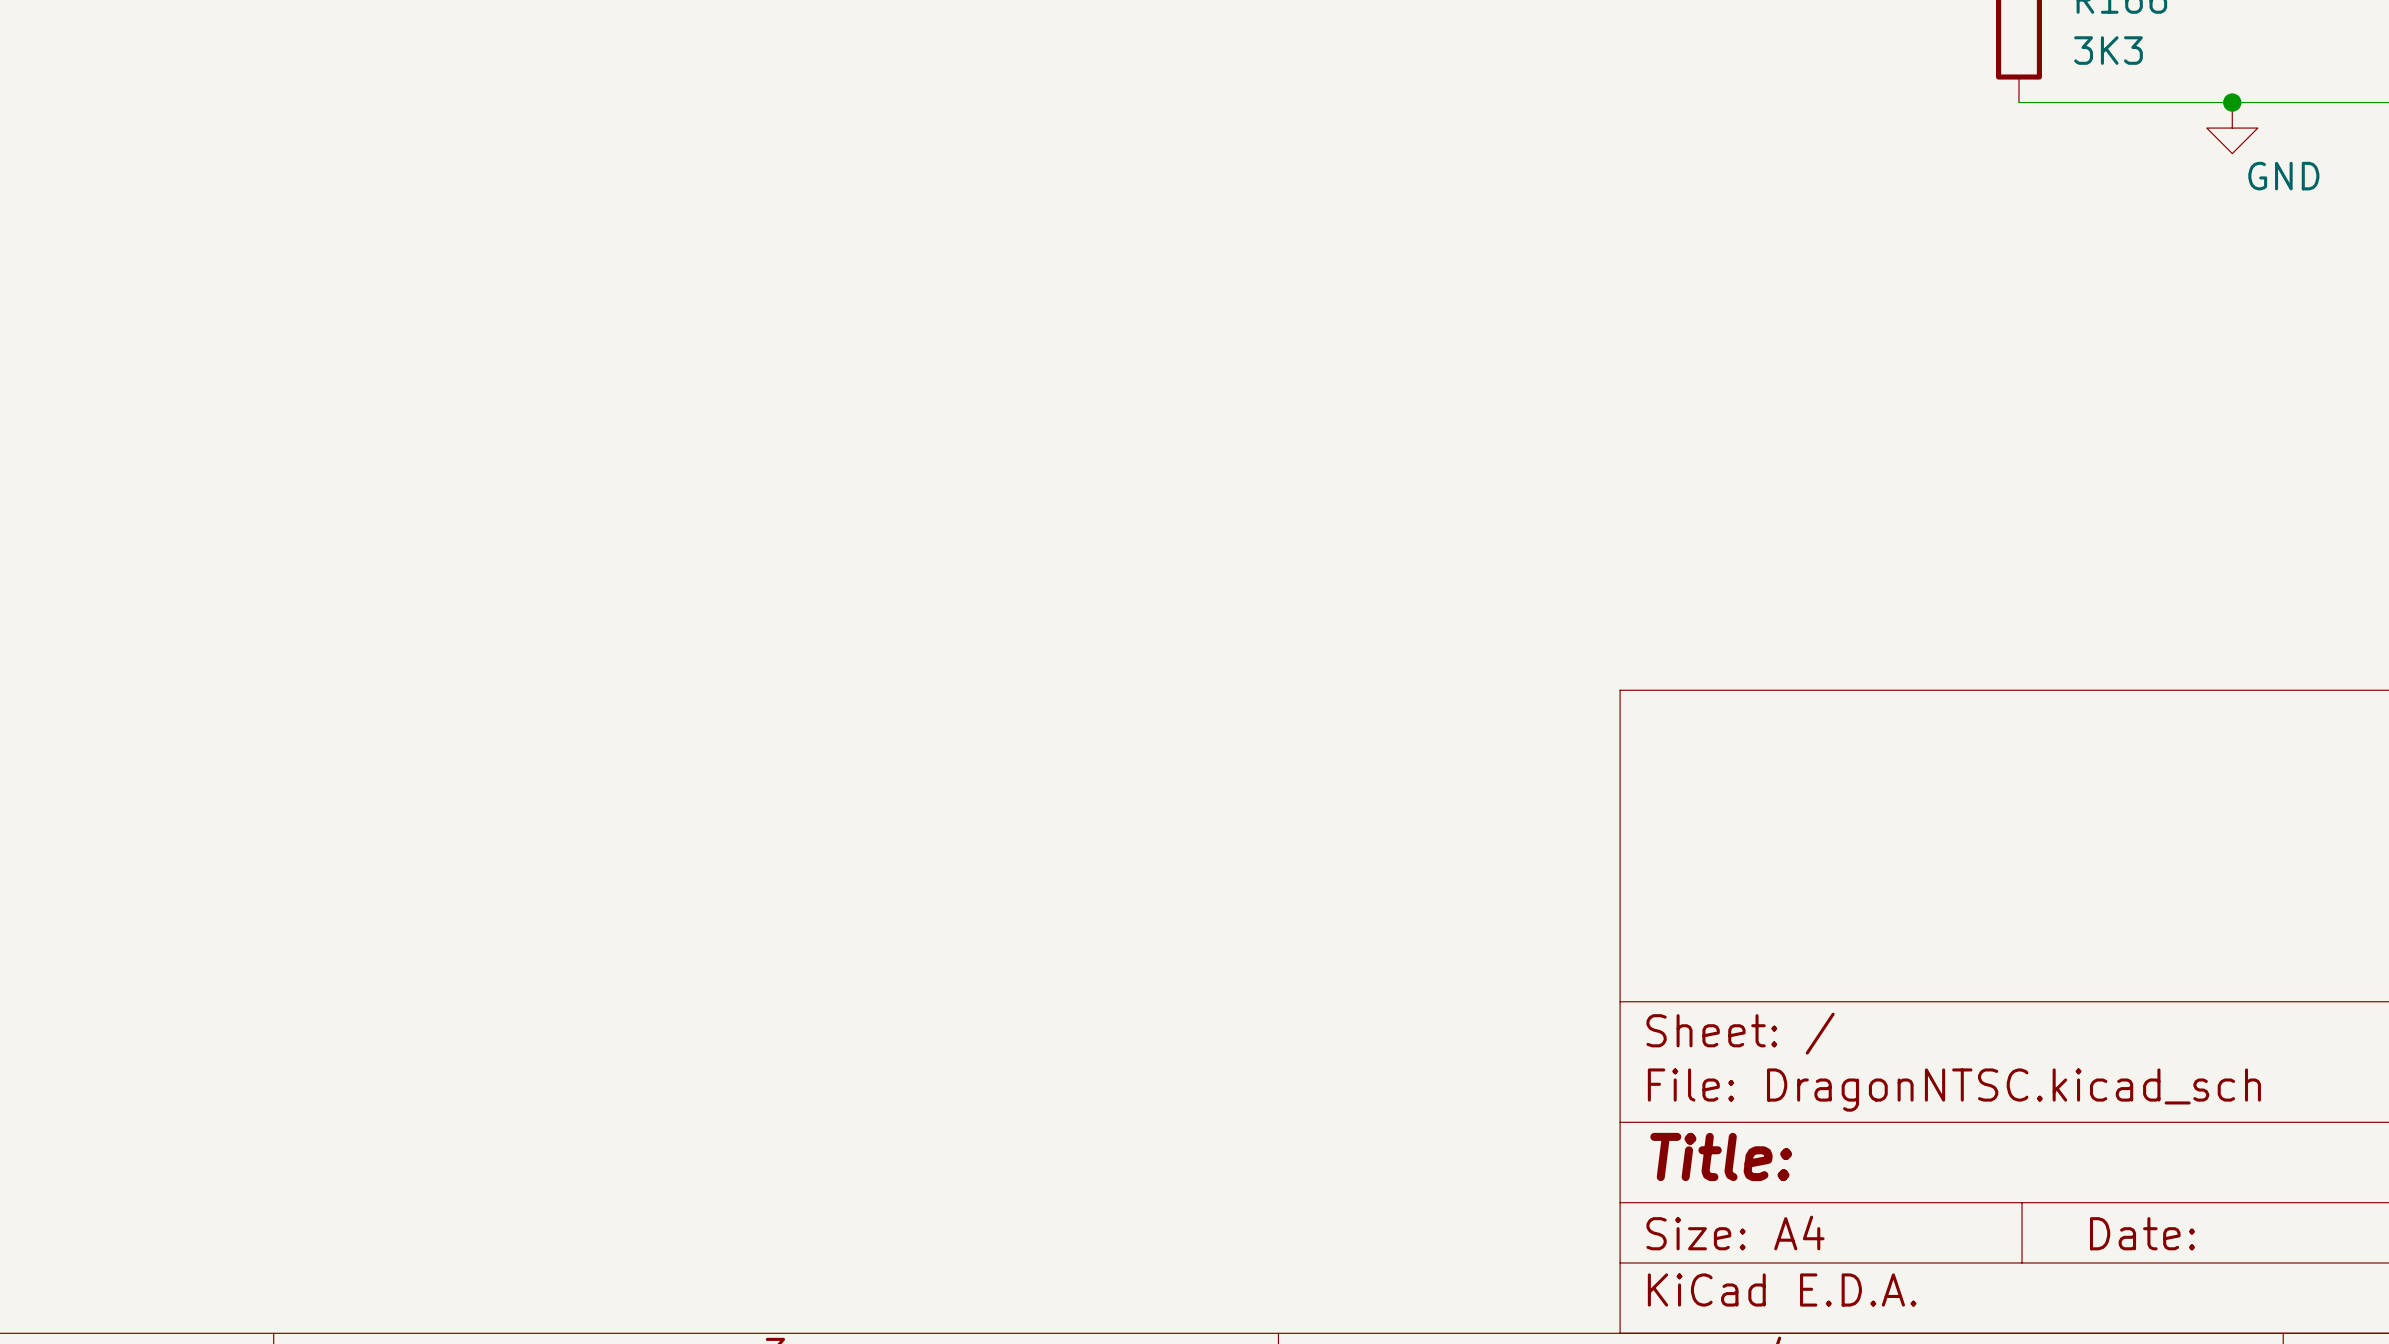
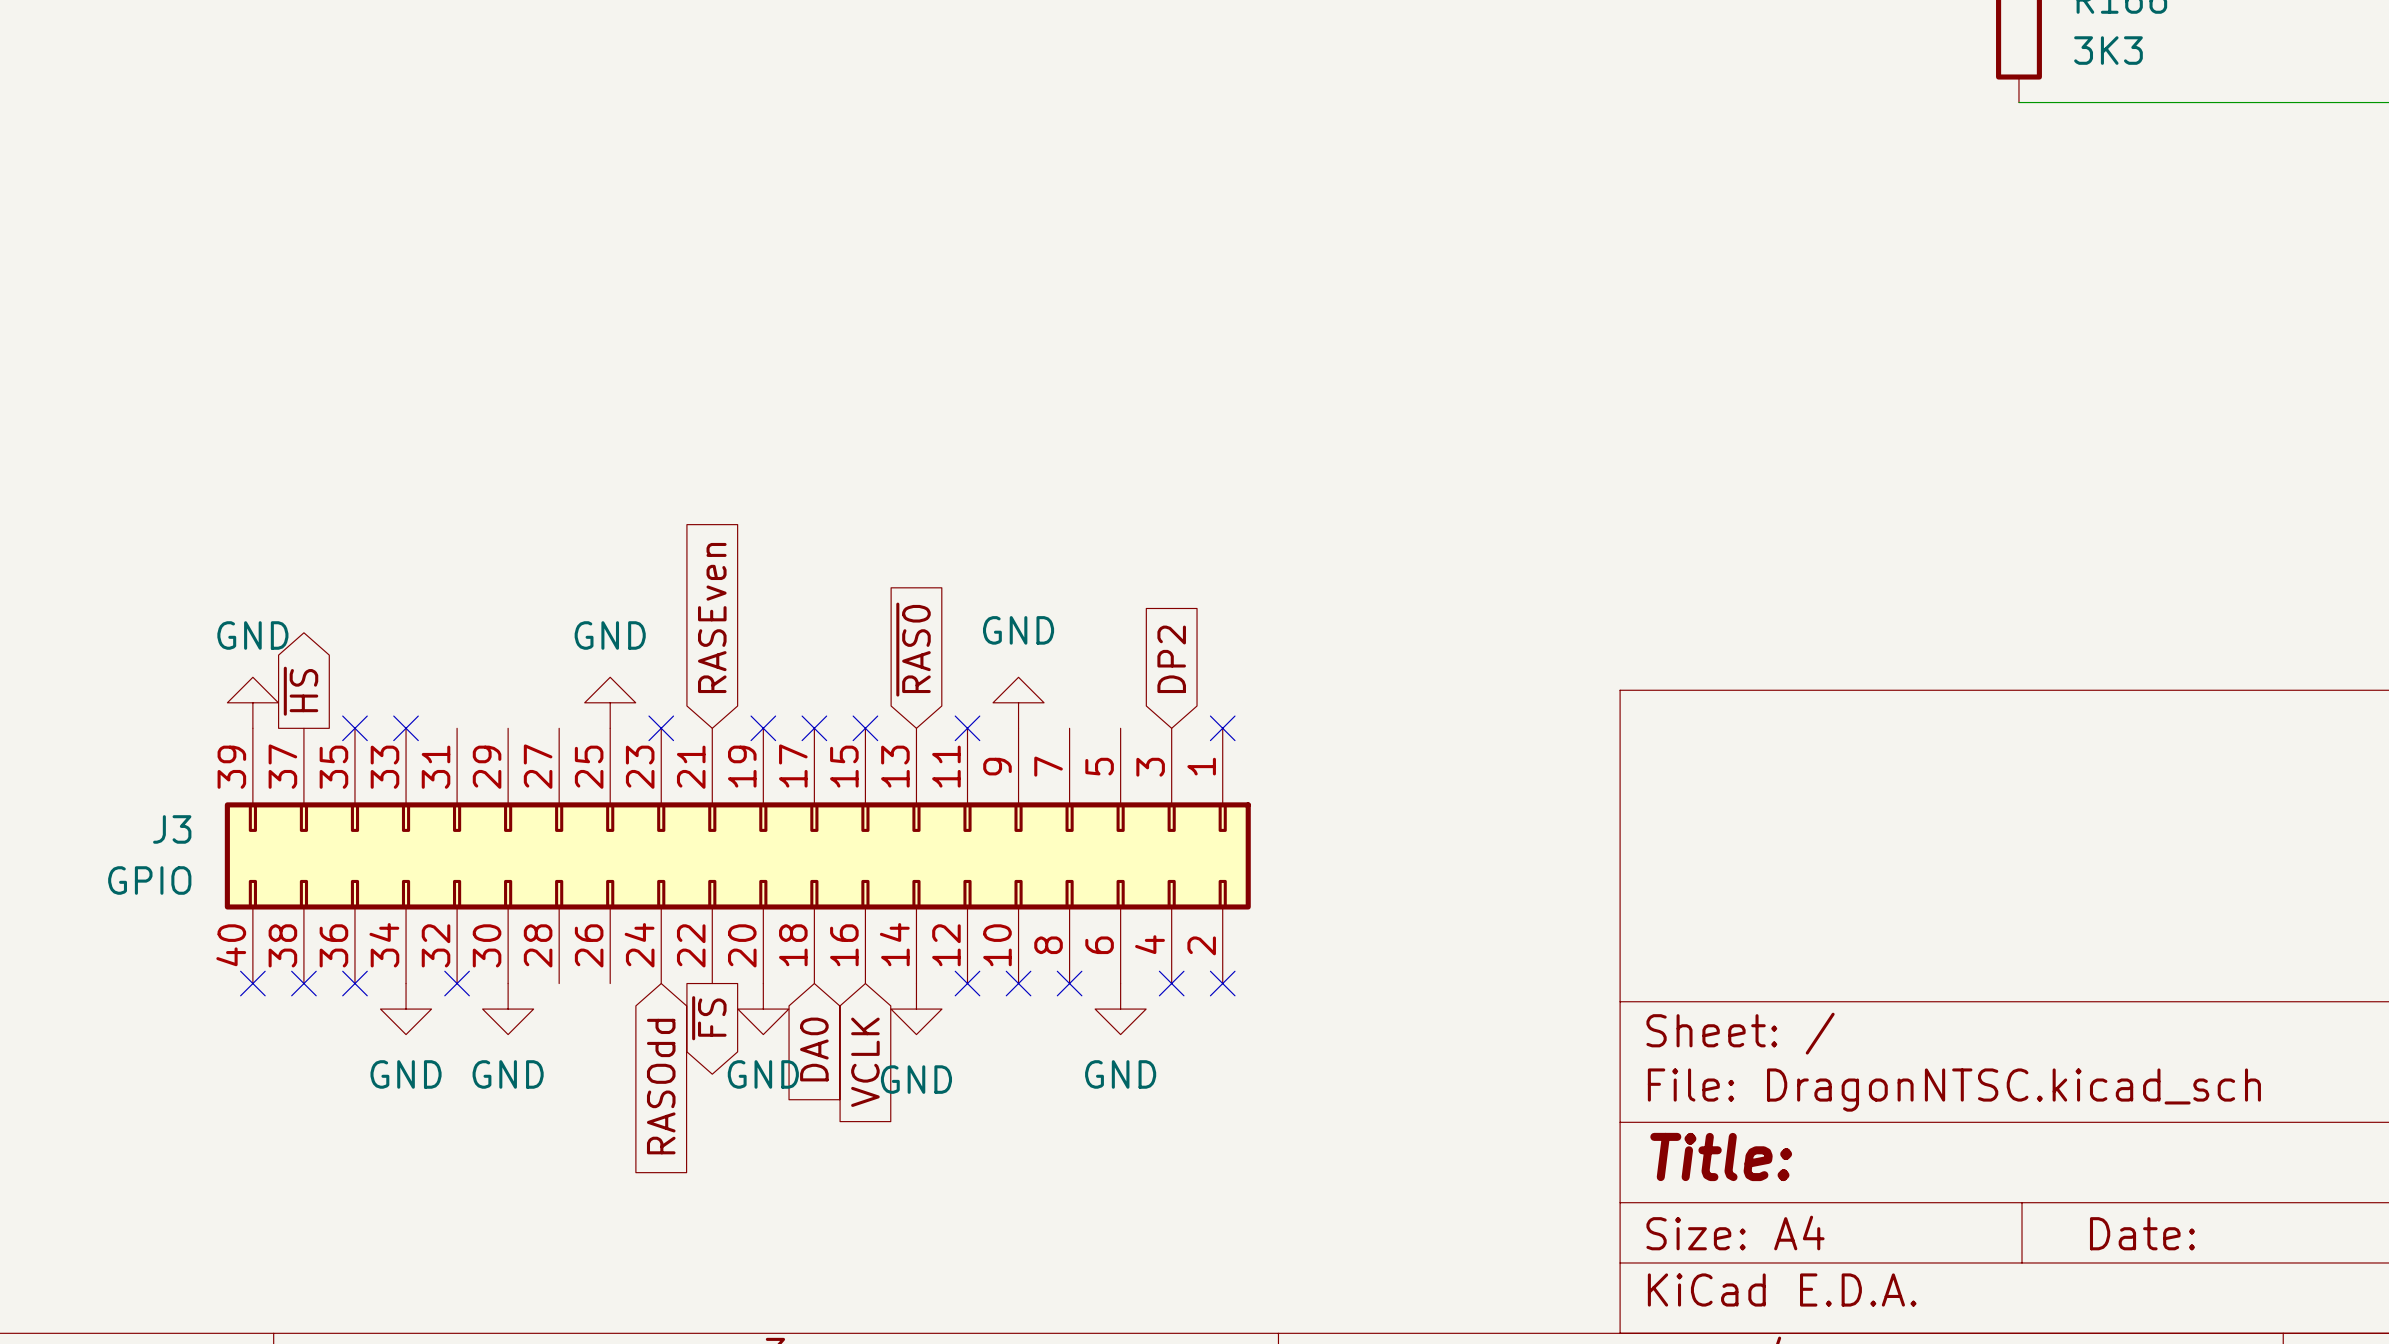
junction: (2232, 102) -> none
power symbol: GND (2232, 128) -> none
global label: none -> RASEven (712, 617)
global label: none -> ~{RAS0} (913, 649)
global label: none -> DP2 (1171, 659)
global label: none -> ~{HS} (301, 691)
power symbol: none -> GND (252, 702)
power symbol: none -> GND (610, 702)
power symbol: none -> GND (1018, 702)
no-connect mark: none -> (354, 728)
no-connect mark: none -> (406, 728)
no-connect mark: none -> (661, 728)
no-connect mark: none -> (763, 728)
no-connect mark: none -> (814, 728)
no-connect mark: none -> (865, 728)
no-connect mark: none -> (967, 728)
no-connect mark: none -> (1222, 728)
J3: none -> GPIO (737, 855)
no-connect mark: none -> (252, 983)
no-connect mark: none -> (303, 983)
no-connect mark: none -> (354, 983)
no-connect mark: none -> (457, 983)
no-connect mark: none -> (967, 983)
no-connect mark: none -> (1018, 983)
no-connect mark: none -> (1069, 983)
no-connect mark: none -> (1171, 983)
no-connect mark: none -> (1222, 983)
power symbol: none -> GND (406, 1009)
power symbol: none -> GND (508, 1009)
power symbol: none -> GND (763, 1009)
power symbol: none -> GND (916, 1009)
power symbol: none -> GND (1120, 1009)
global label: none -> ~{FS} (709, 1018)
global label: none -> DA0 (814, 1049)
global label: none -> VCLK (865, 1062)
global label: none -> RASOdd (661, 1086)

